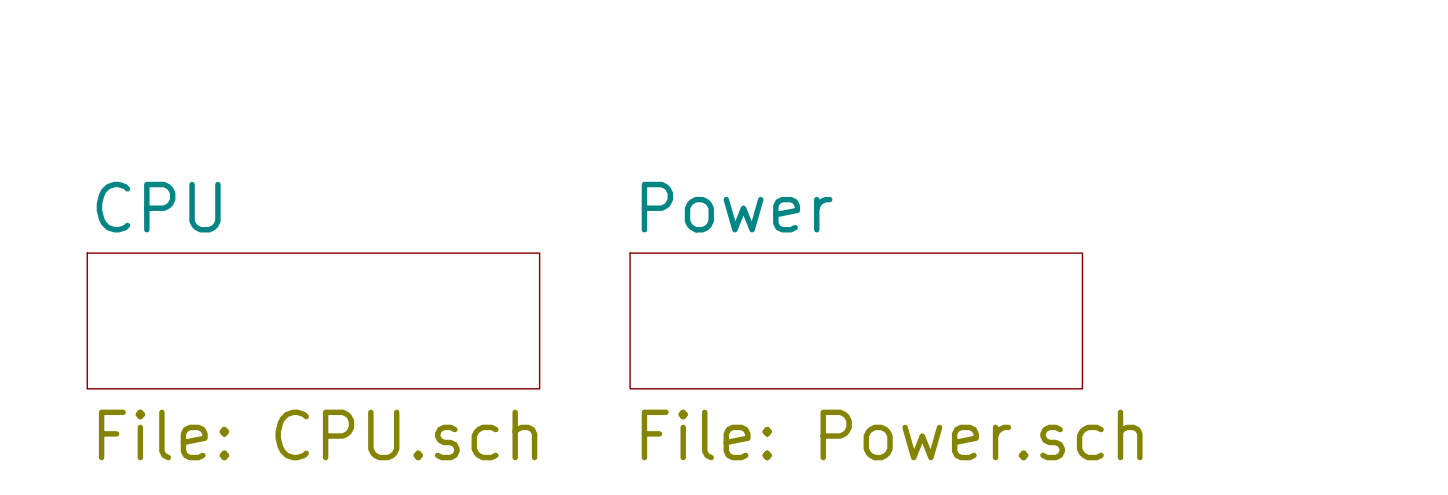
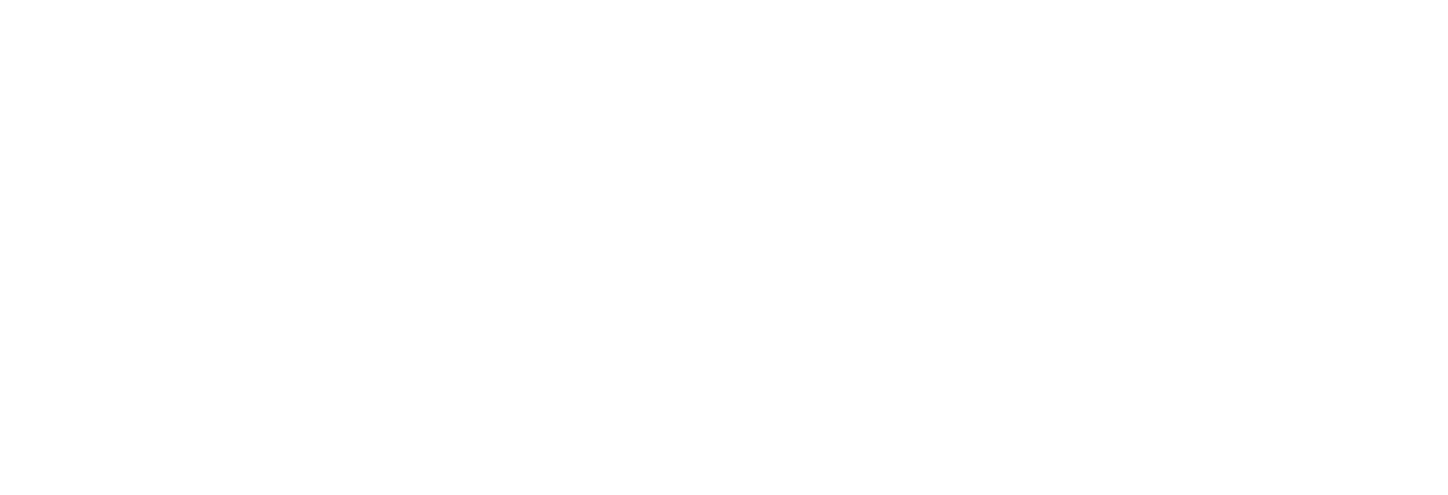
sheet CPU: File: CPU.sch (313, 320) -> none
sheet Power: File: Power.sch (856, 320) -> none

